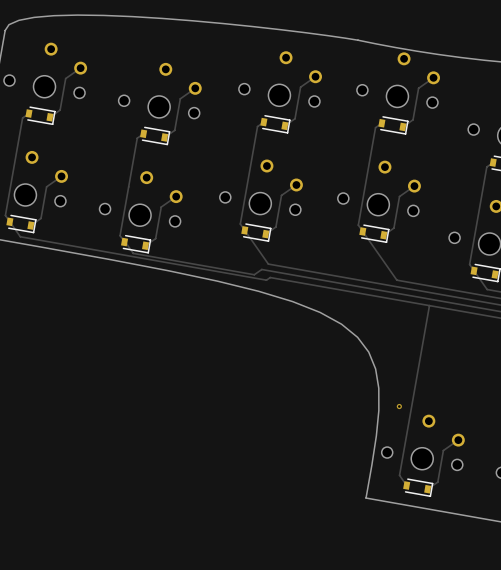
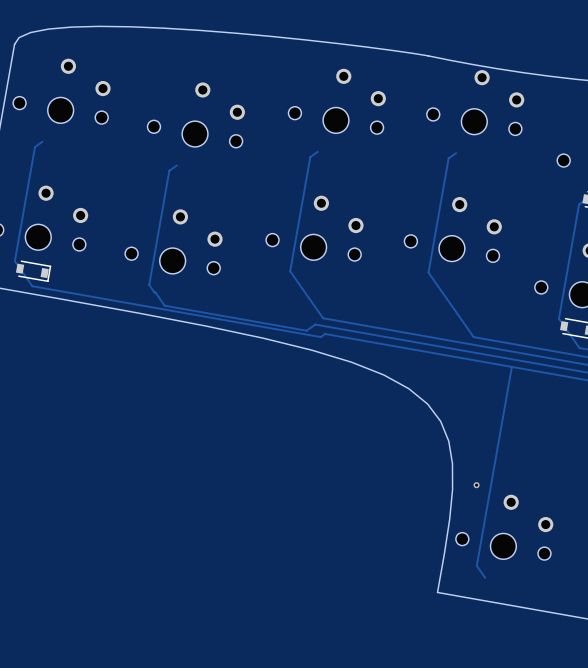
track: (80, 68) (65, 78) (60, 110) (50, 117) -> none
track: (315, 76) (300, 87) (295, 118) (284, 125) -> none
track: (433, 77) (418, 88) (413, 119) (402, 126) -> none
track: (195, 88) (180, 98) (174, 130) (164, 137) -> none
part: (40, 115) -> none
part: (275, 124) -> none
part: (393, 125) -> none
part: (155, 135) -> none
track: (61, 176) (46, 186) (41, 218) (30, 225) -> none
track: (296, 184) (281, 195) (275, 227) (265, 234) -> none
track: (414, 186) (399, 196) (393, 228) (383, 235) -> none
track: (176, 196) (161, 207) (155, 238) (145, 245) -> none
part: (256, 232) -> none
part: (374, 233) -> none
part: (135, 244) -> none
track: (458, 440) (443, 450) (437, 482) (427, 489) -> none
part: (418, 487) -> none

